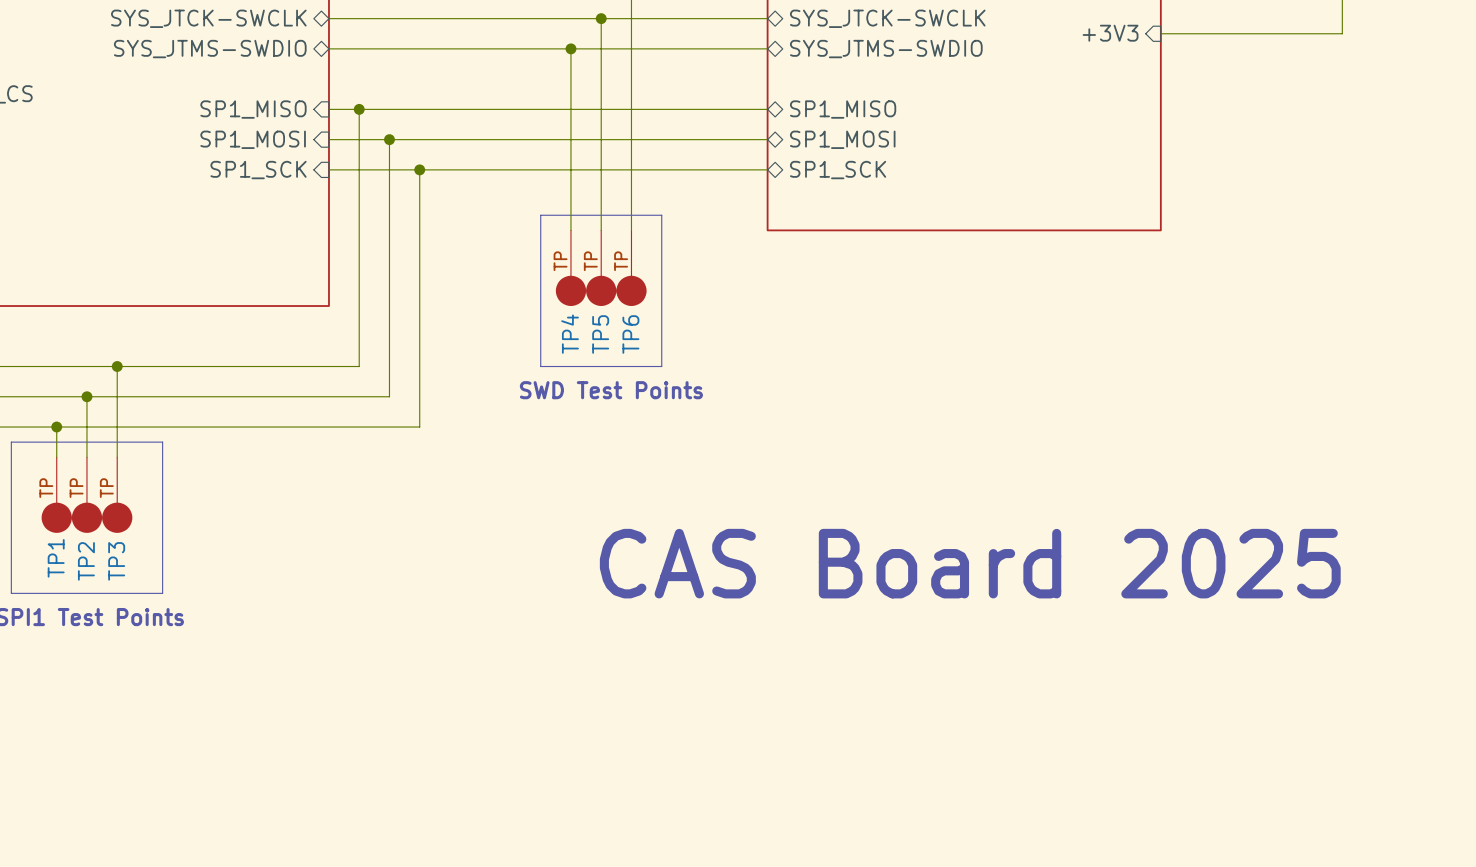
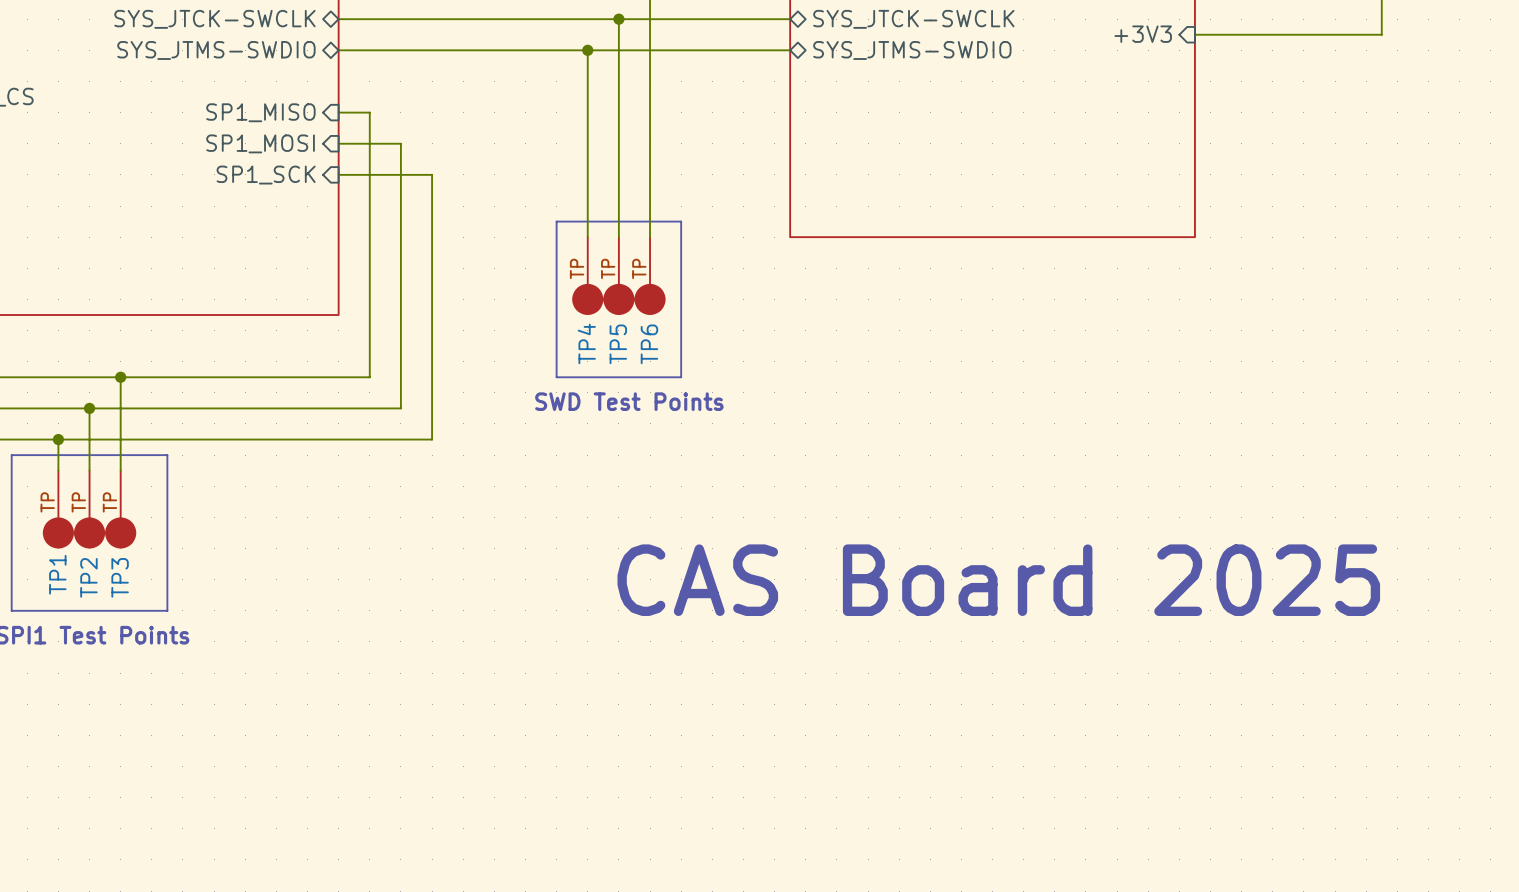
wire: (359, 109) (767, 109) -> none
junction: (359, 109) -> none
sheet pin: SP1_MISO (843, 109) -> none
wire: (389, 139) (767, 139) -> none
junction: (389, 139) -> none
sheet pin: SP1_MOSI (842, 139) -> none
wire: (419, 169) (767, 169) -> none
junction: (419, 169) -> none
sheet pin: SP1_SCK (838, 170) -> none

